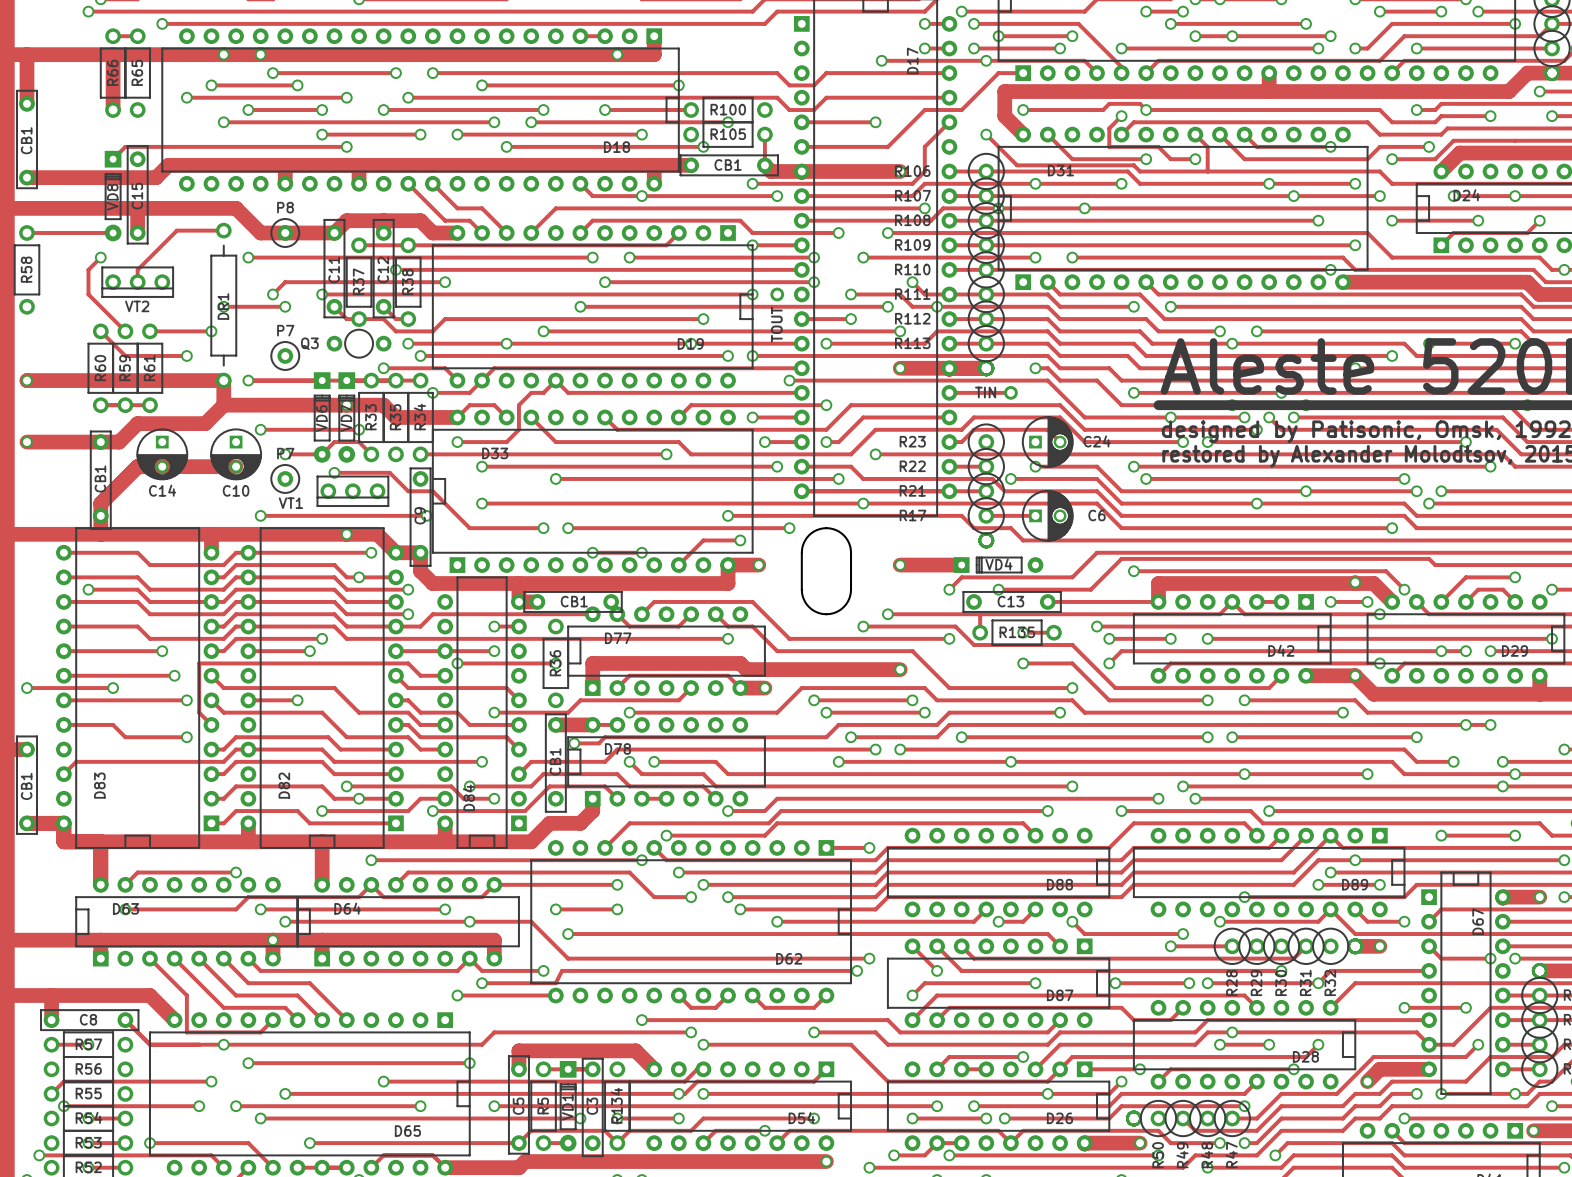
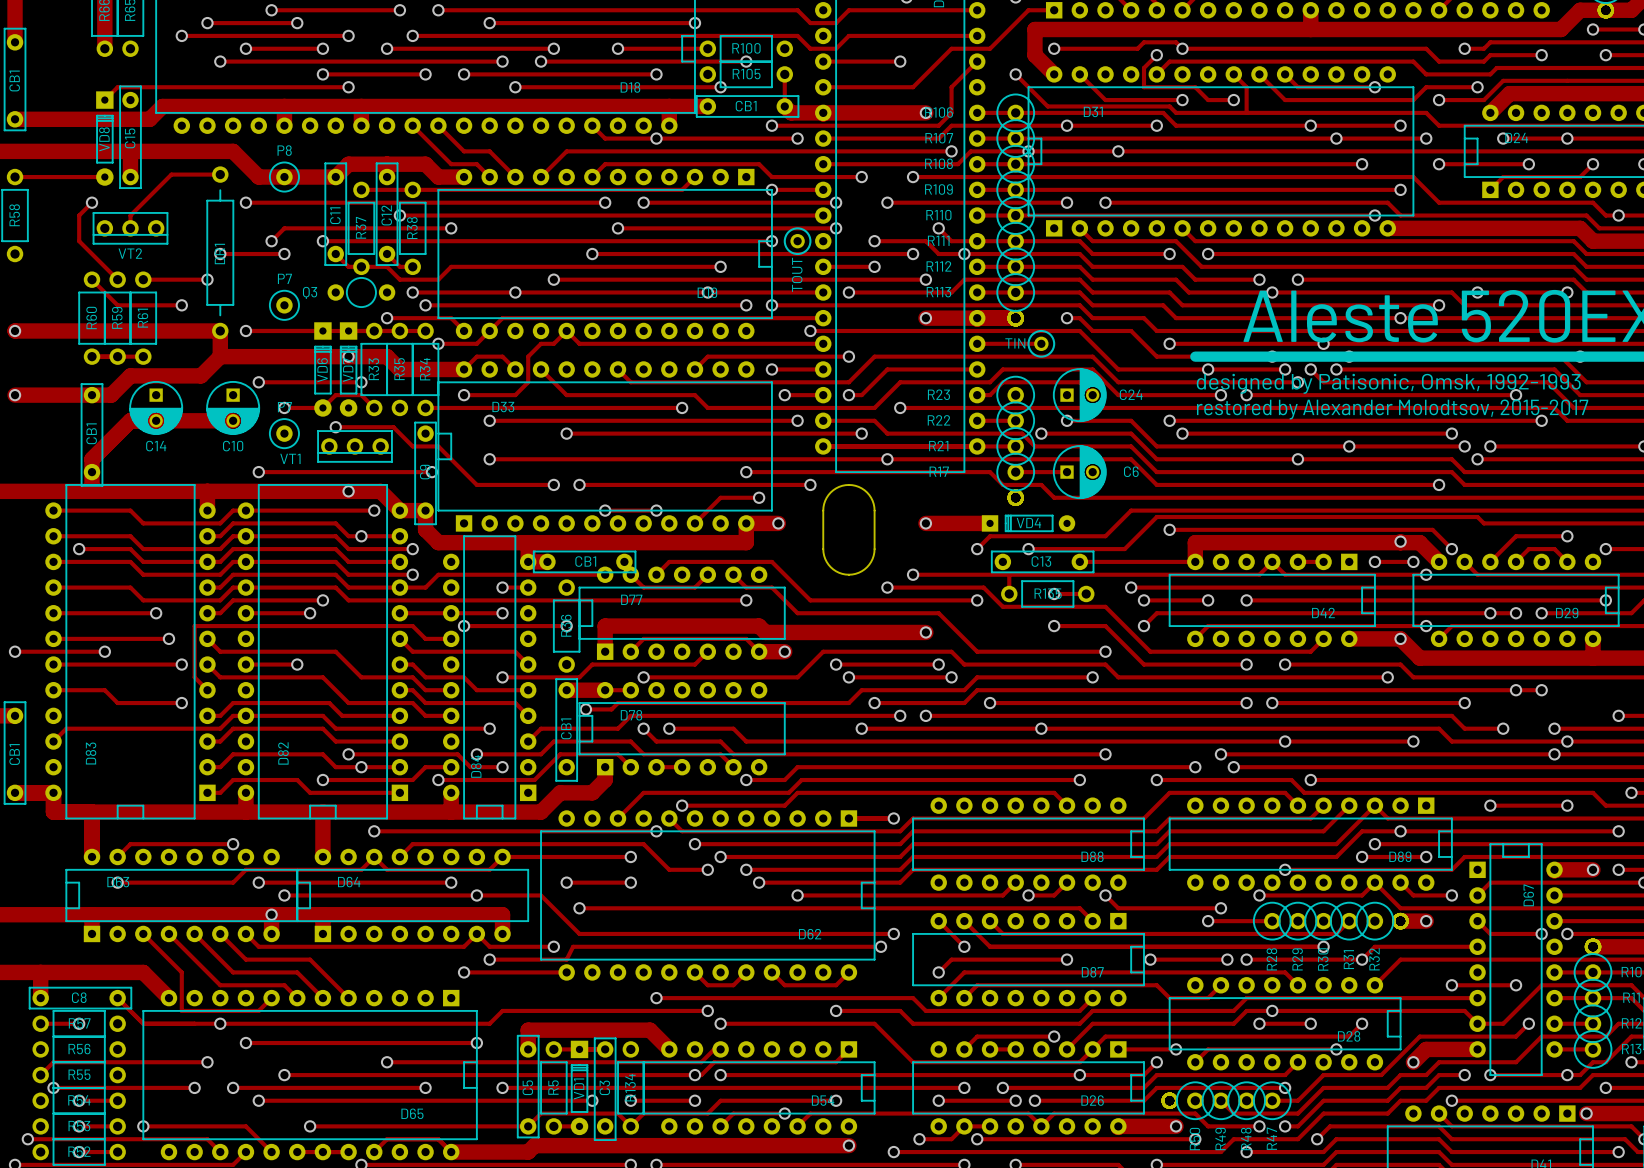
drawing: none -> [783, 227, 812, 256]
drawing: none -> [1027, 329, 1056, 358]

